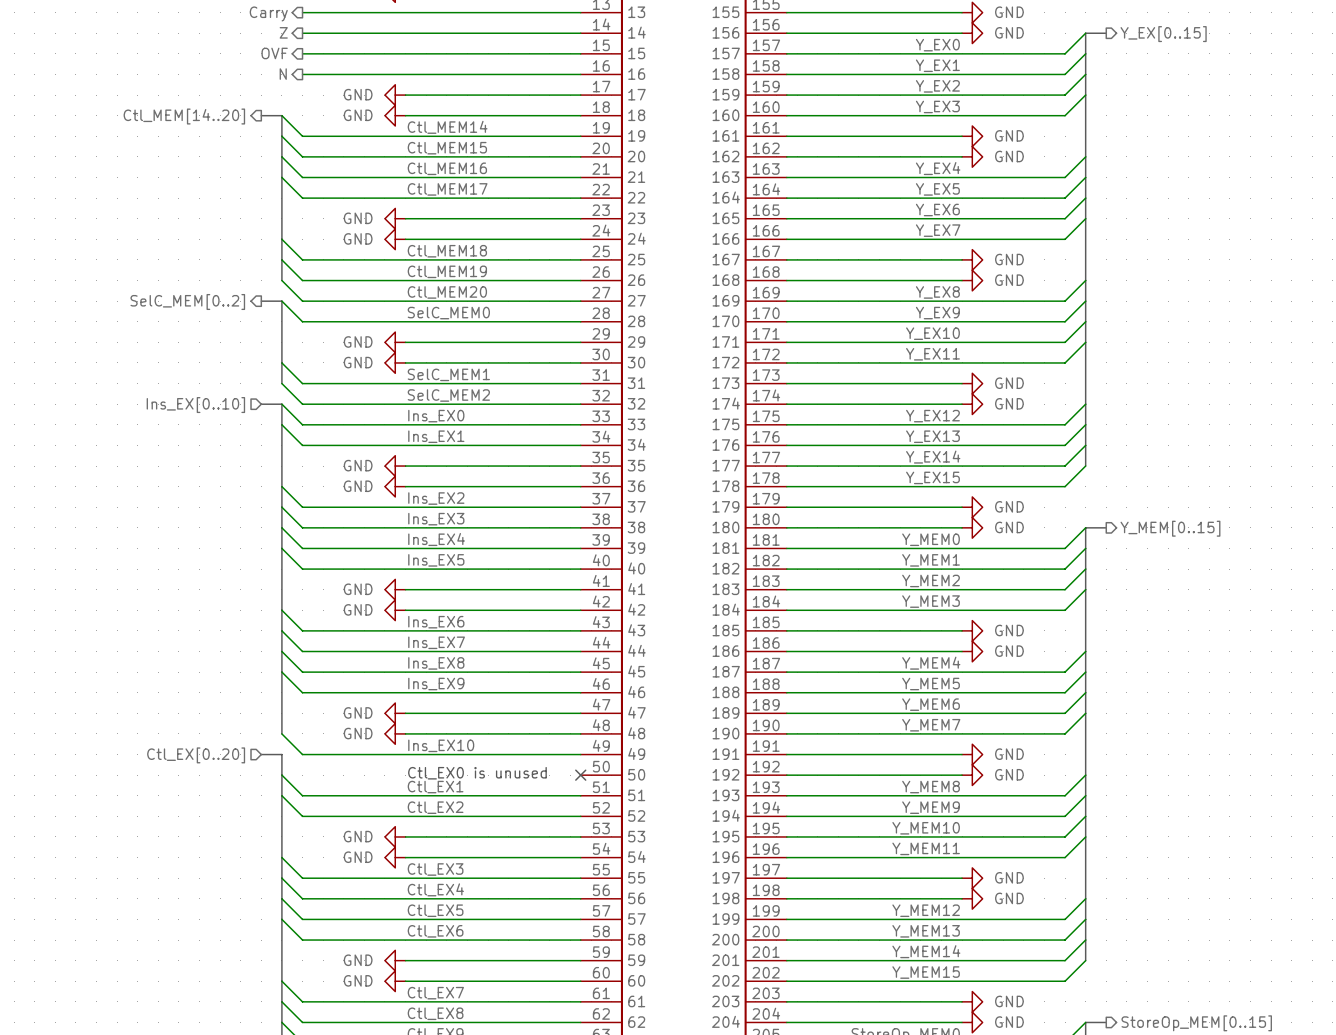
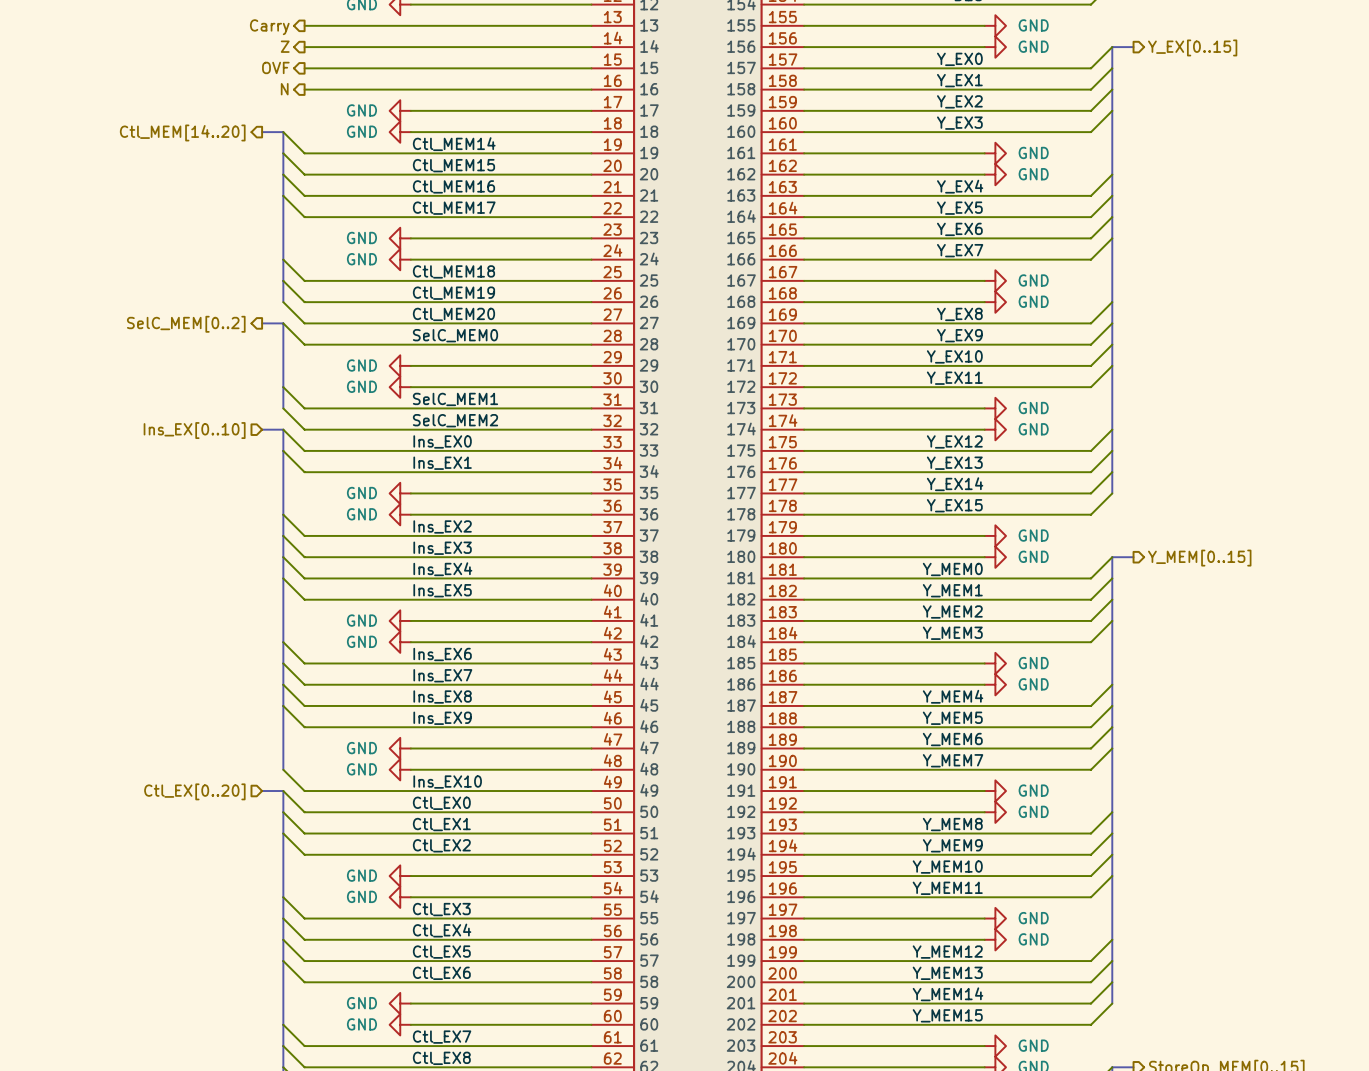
wire: none -> (283, 791) (304, 812) (591, 812)
label: none -> Ctl_EX0 (441, 803)
text: Ctl_EX0 is unused (477, 773) -> none
no-connect mark: (580, 775) -> none

